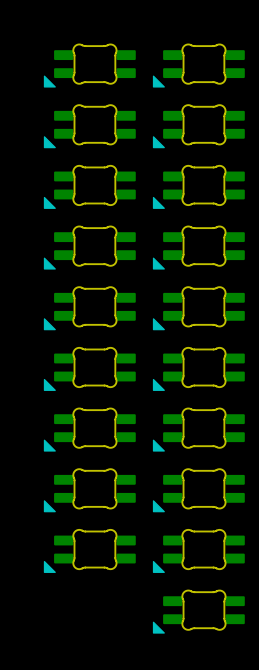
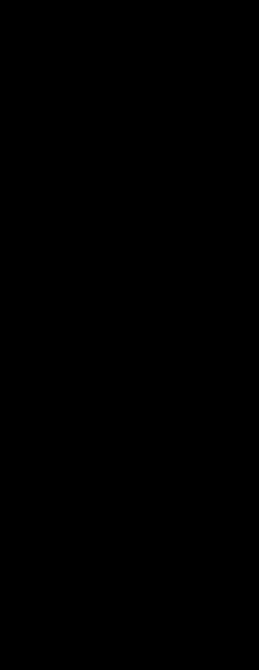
part: (89, 65) -> none
part: (198, 65) -> none
part: (89, 126) -> none
part: (198, 126) -> none
part: (89, 187) -> none
part: (198, 187) -> none
part: (89, 247) -> none
part: (198, 247) -> none
part: (89, 308) -> none
part: (198, 308) -> none
part: (89, 369) -> none
part: (198, 369) -> none
part: (89, 429) -> none
part: (198, 429) -> none
part: (89, 490) -> none
part: (198, 490) -> none
part: (89, 551) -> none
part: (198, 551) -> none
part: (198, 611) -> none

